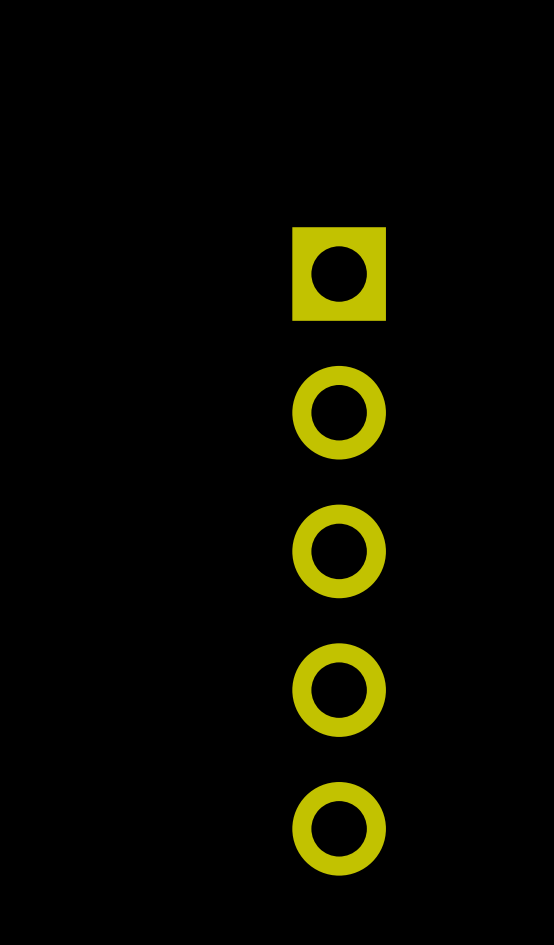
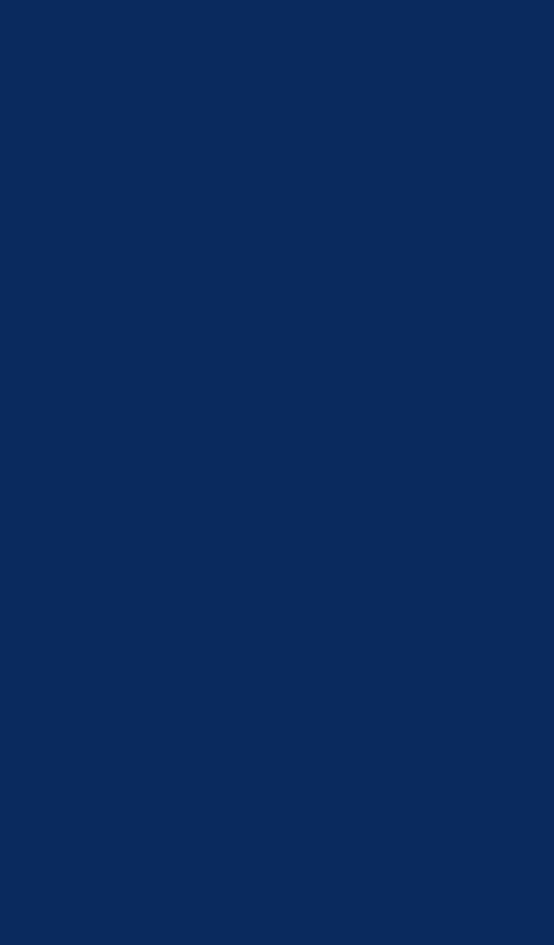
part: (339, 551) -> none

